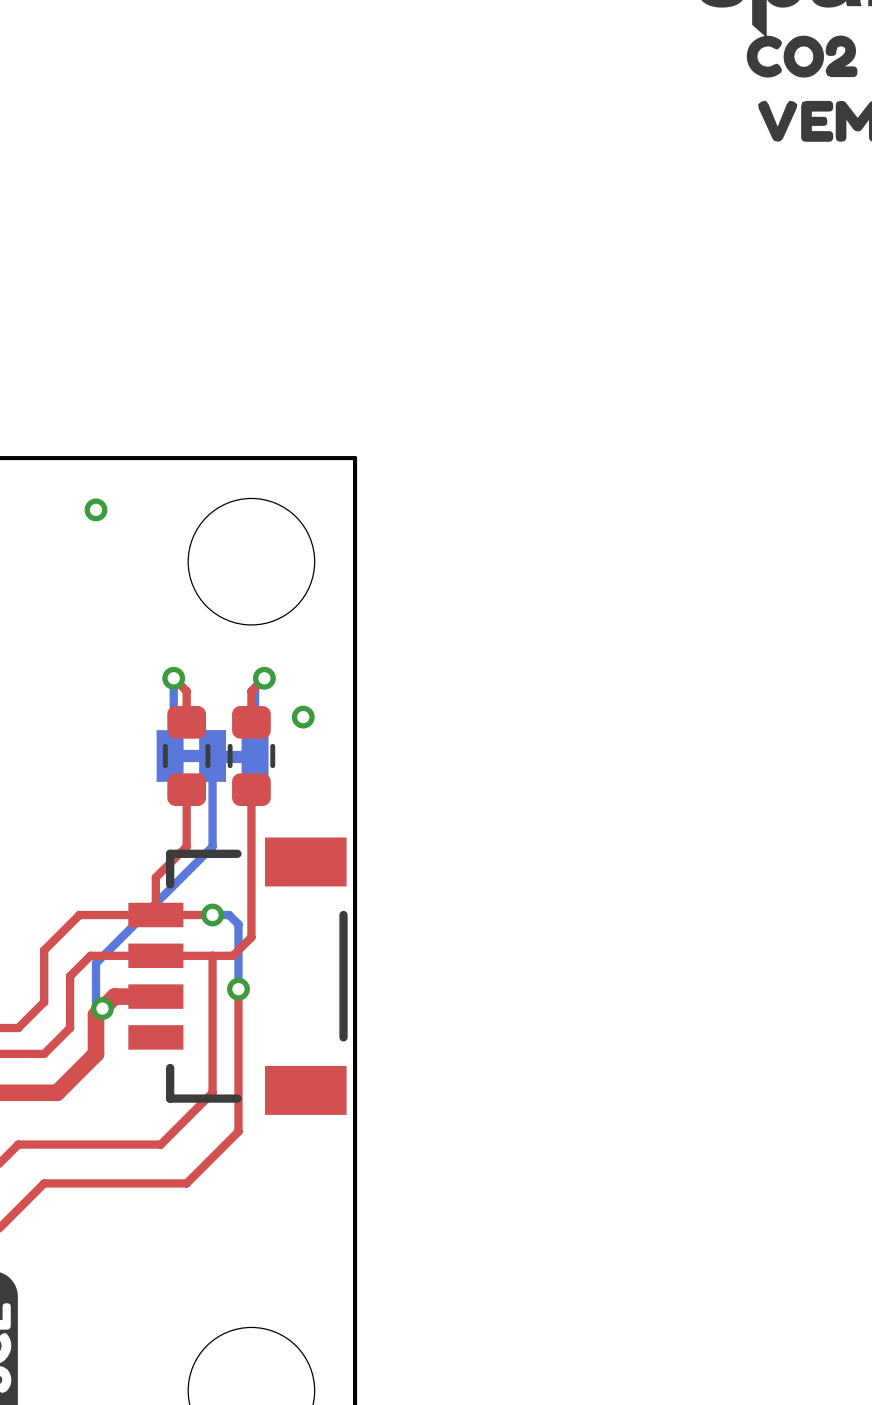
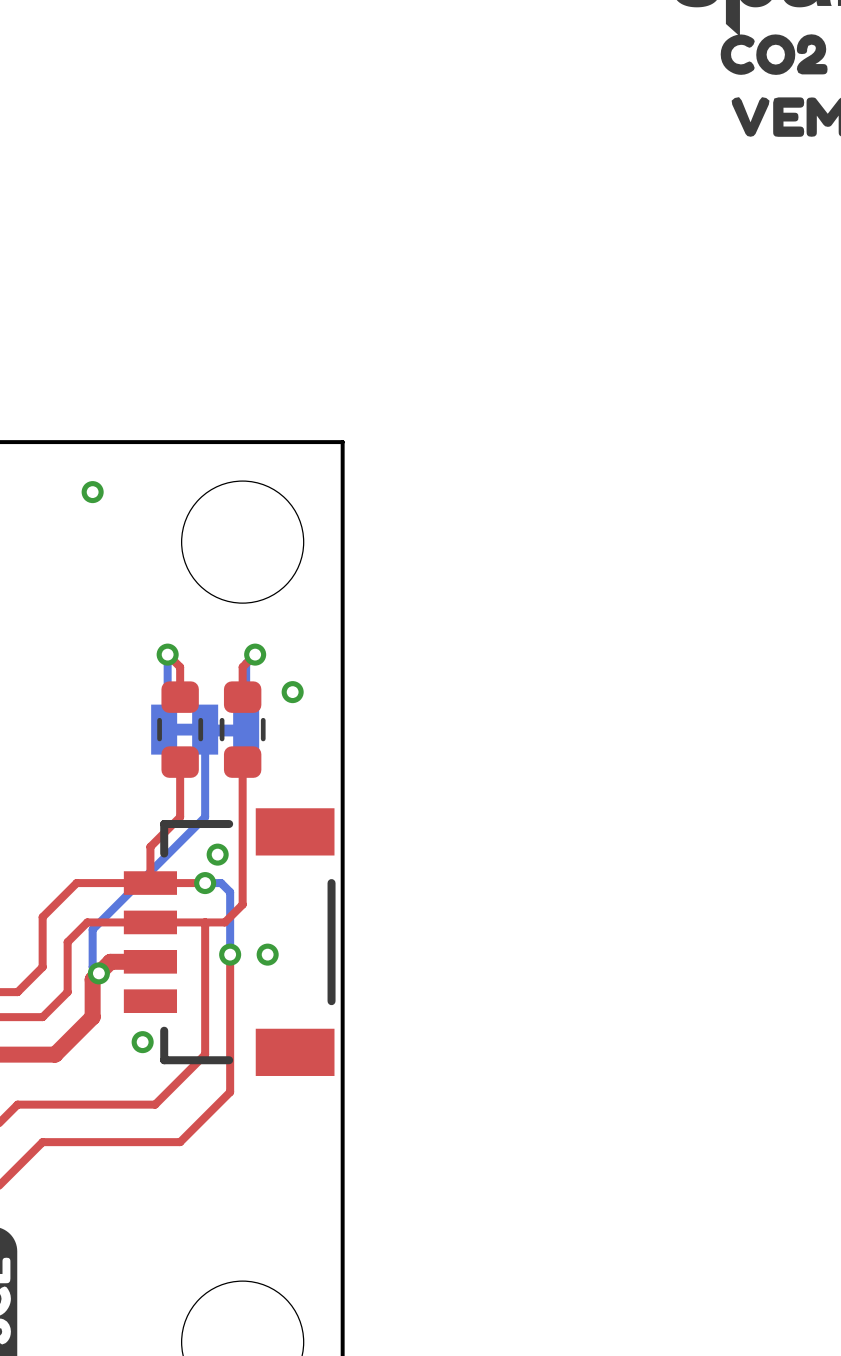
via: none -> (217, 854)
via: none -> (267, 954)
via: none -> (142, 1042)

